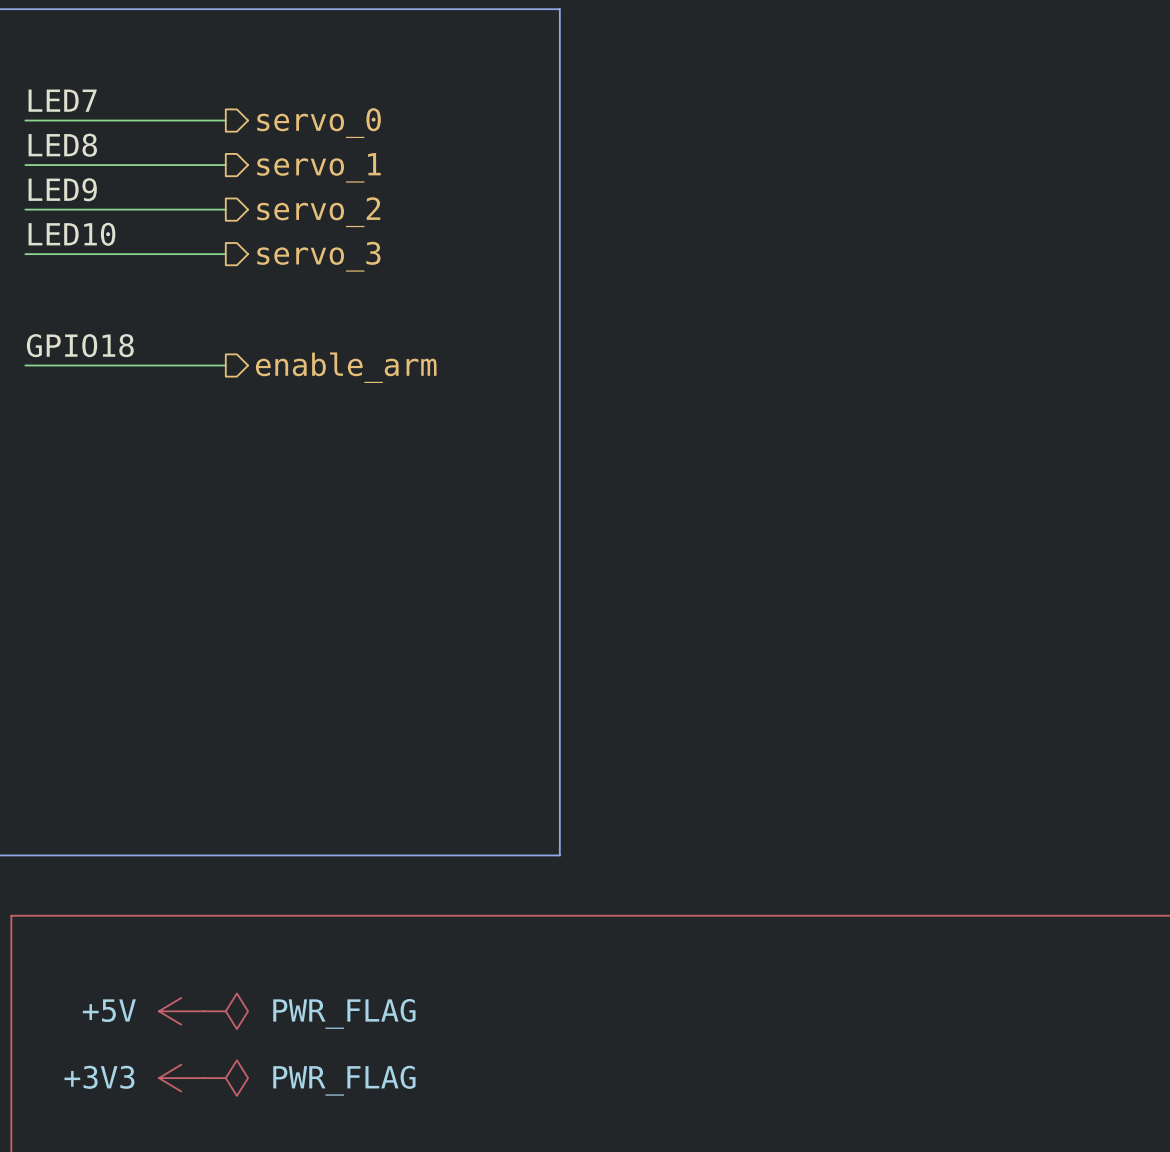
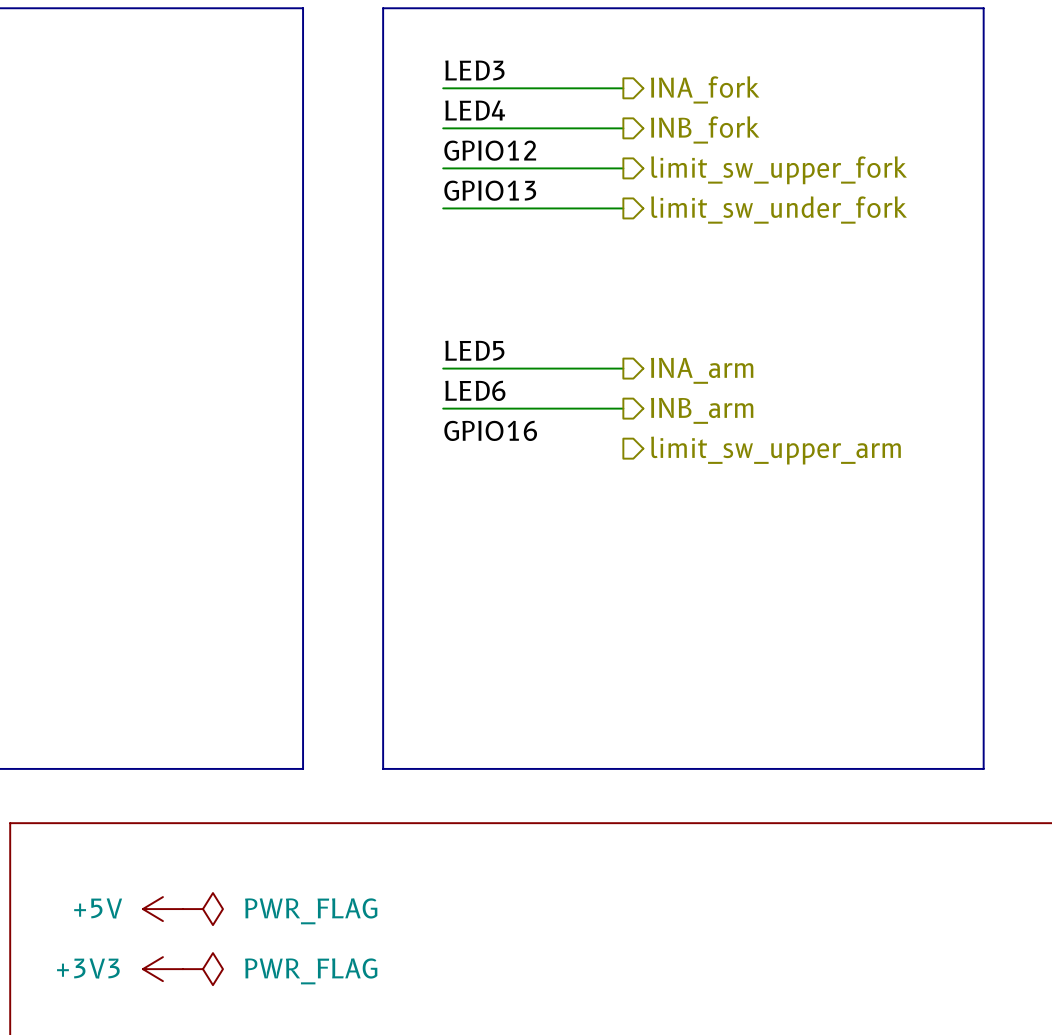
line: (337, 9) (426, 9) -> (303, 8) (303, 768)
line: (559, 9) (559, 855) -> (503, 8) (983, 8) (983, 768) (503, 768)
label: none -> LED3 (474, 70)
wire: none -> (443, 88) (623, 88)
label: LED7 (62, 100) -> none
hierarchical label: none -> INA_fork (705, 89)
wire: (25, 120) (225, 120) -> none
label: none -> LED4 (475, 110)
hierarchical label: servo_0 (319, 123) -> none
wire: none -> (443, 128) (623, 128)
label: LED8 (62, 145) -> none
hierarchical label: none -> INB_fork (705, 129)
wire: (25, 165) (225, 165) -> none
hierarchical label: servo_1 (318, 167) -> none
label: none -> GPIO12 (490, 150)
wire: none -> (443, 168) (623, 168)
label: LED9 (62, 189) -> none
hierarchical label: none -> limit_sw_upper_fork (779, 170)
wire: (25, 209) (225, 209) -> none
hierarchical label: servo_2 (318, 212) -> none
label: none -> GPIO13 (490, 190)
wire: none -> (443, 208) (623, 208)
label: LED10 (71, 234) -> none
hierarchical label: none -> limit_sw_under_fork (779, 210)
wire: (25, 254) (225, 254) -> none
hierarchical label: servo_3 (318, 256) -> none
label: GPIO18 (80, 345) -> none
wire: (25, 365) (225, 365) -> none
hierarchical label: enable_arm (346, 367) -> none
label: none -> LED5 (474, 350)
wire: none -> (443, 368) (623, 368)
hierarchical label: none -> INA_arm (702, 370)
label: none -> LED6 (475, 390)
wire: none -> (443, 408) (623, 408)
hierarchical label: none -> INB_arm (702, 410)
label: none -> GPIO16 (490, 430)
hierarchical label: none -> limit_sw_upper_arm (775, 450)
line: (337, 855) (426, 855) -> (383, 8) (383, 768)

